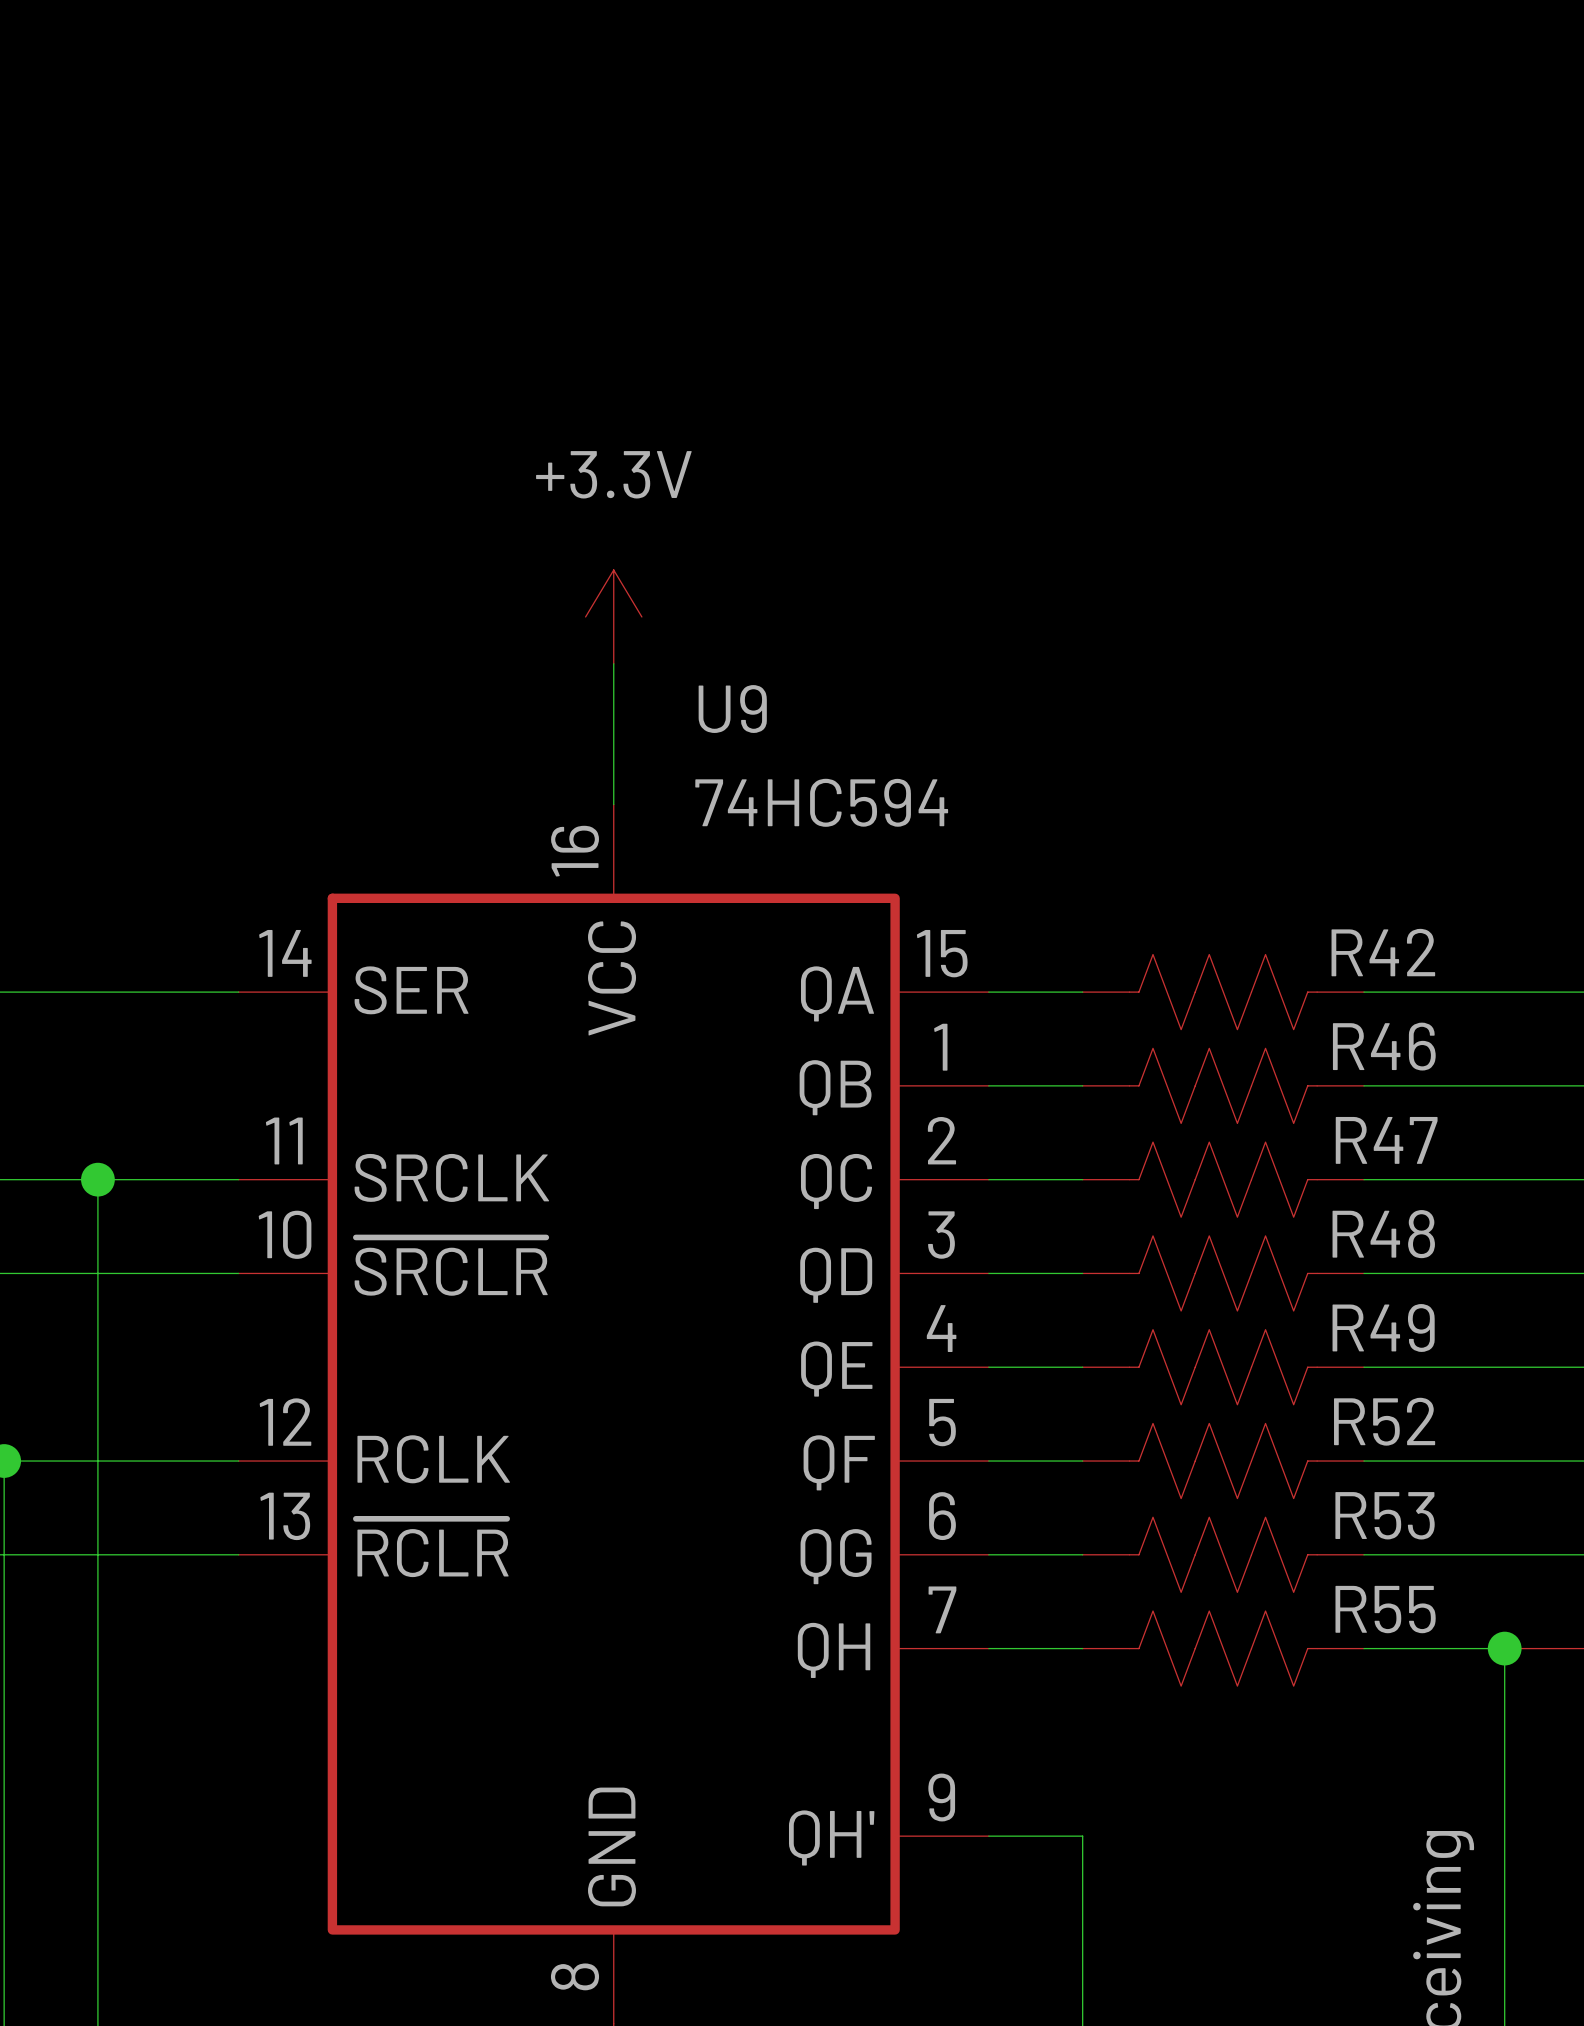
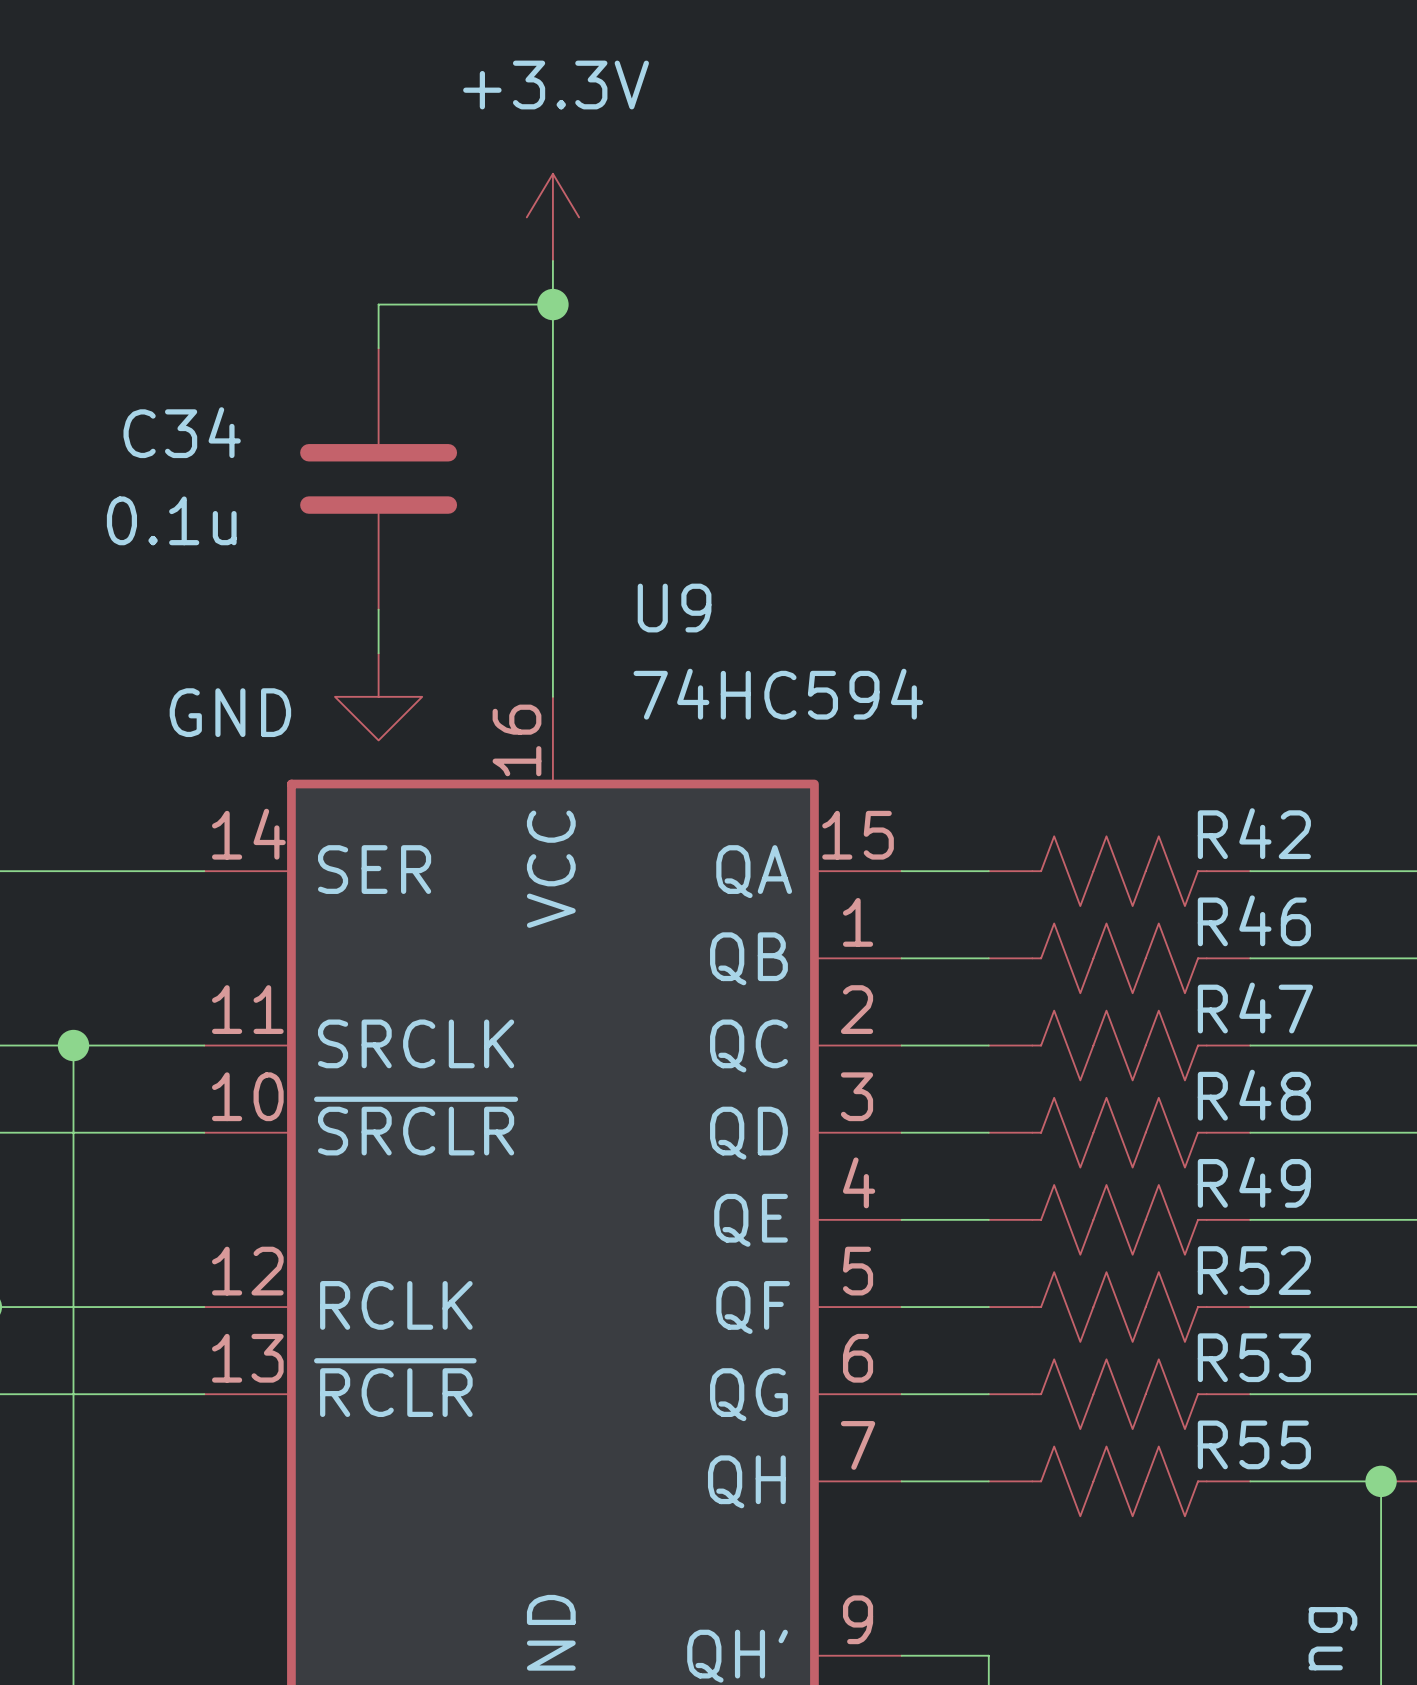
wire: none -> (552, 260) (552, 566)
wire: none -> (552, 304) (378, 304) (378, 348)
junction: none -> (552, 304)
C34: none -> 0.1u (378, 478)
power symbol position: +3.3V (613, 616) -> +3.3V (552, 217)
wire: none -> (378, 609) (378, 653)
power symbol: none -> GND (378, 696)

